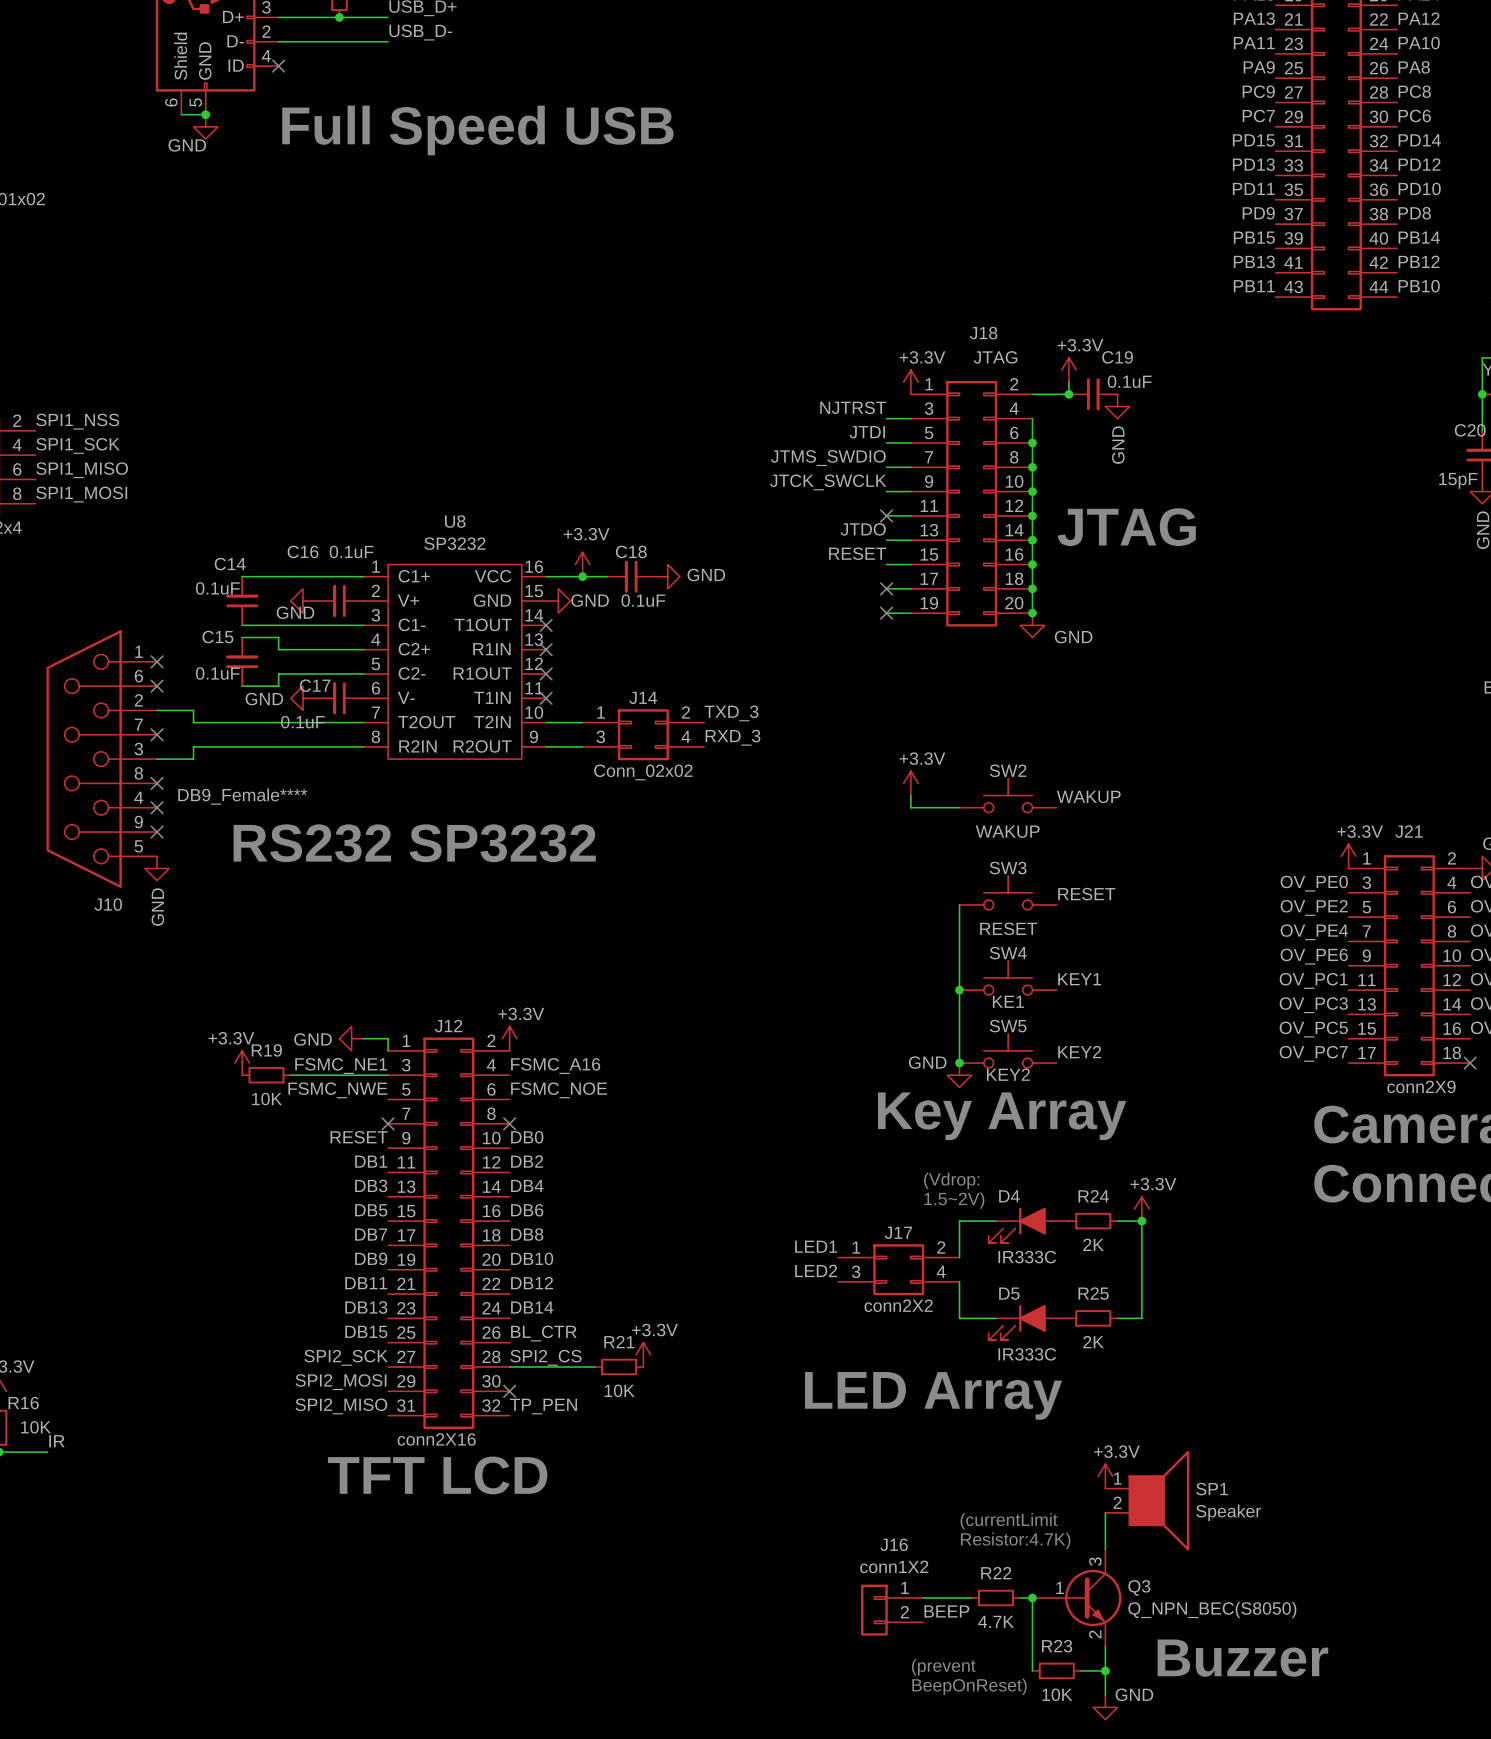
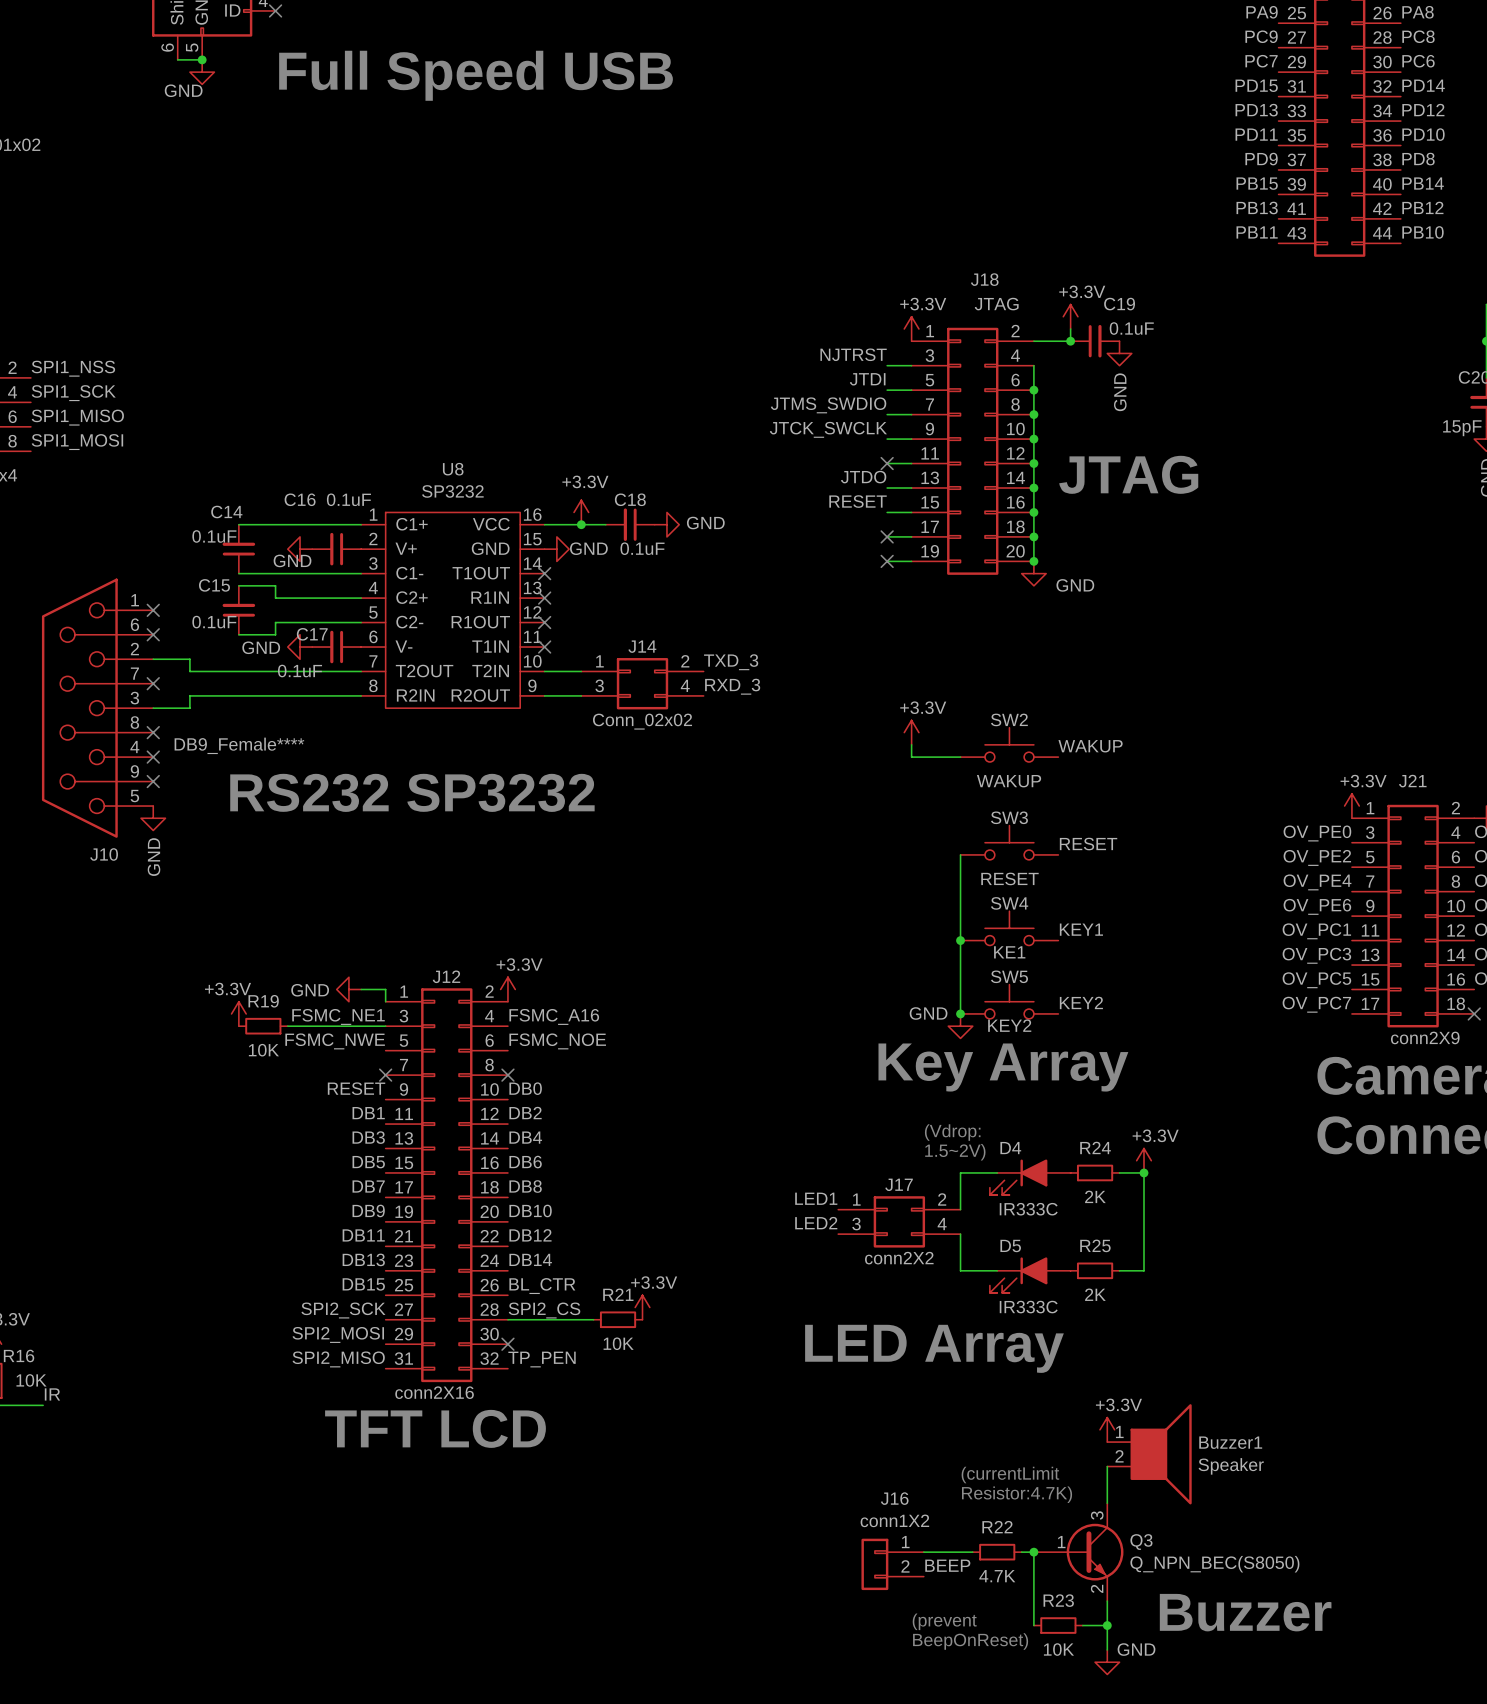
SP1 name: SP1 (1212, 1489) -> Buzzer1 (1230, 1442)

